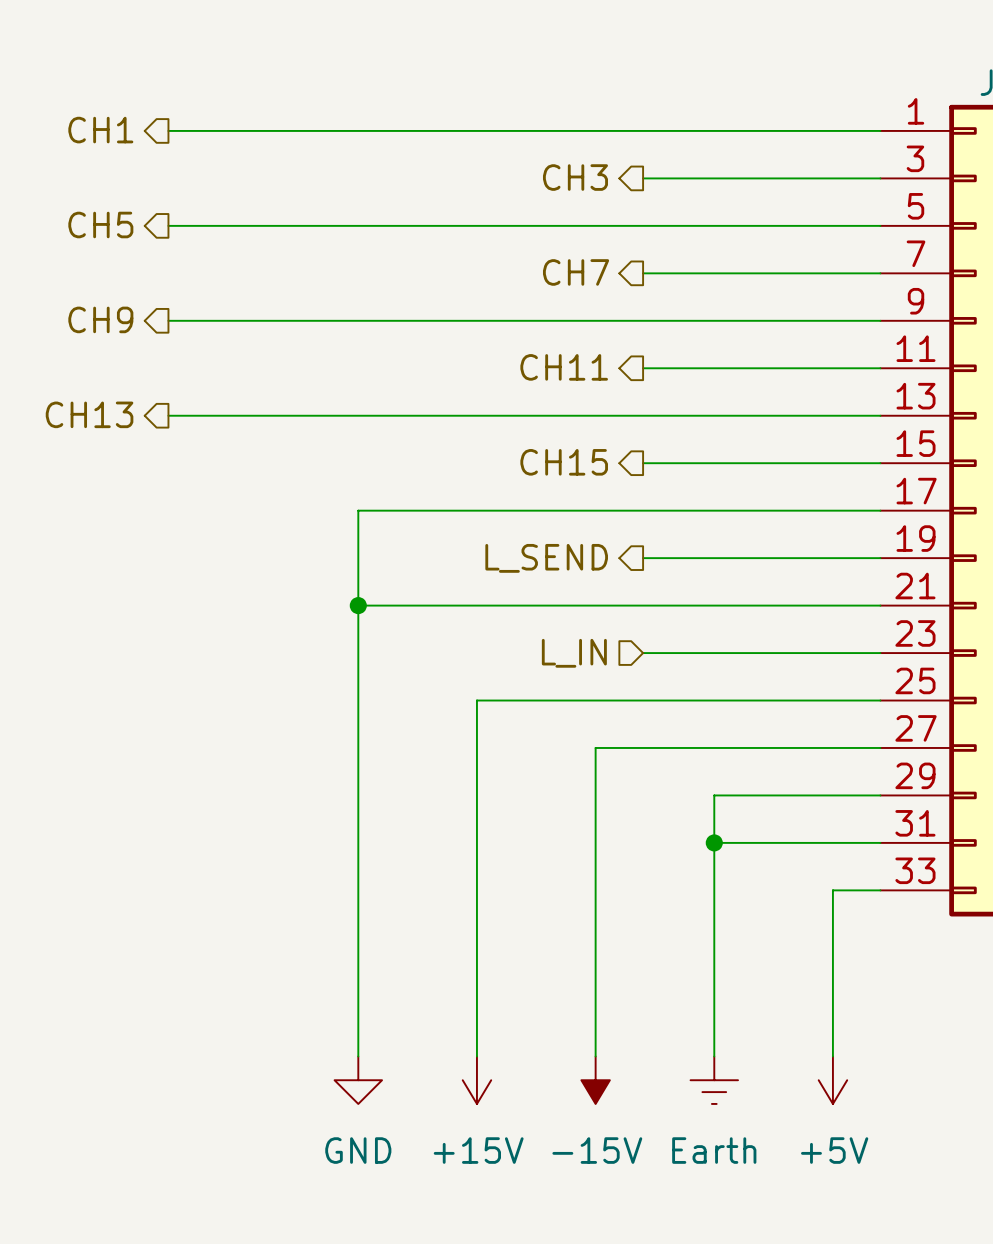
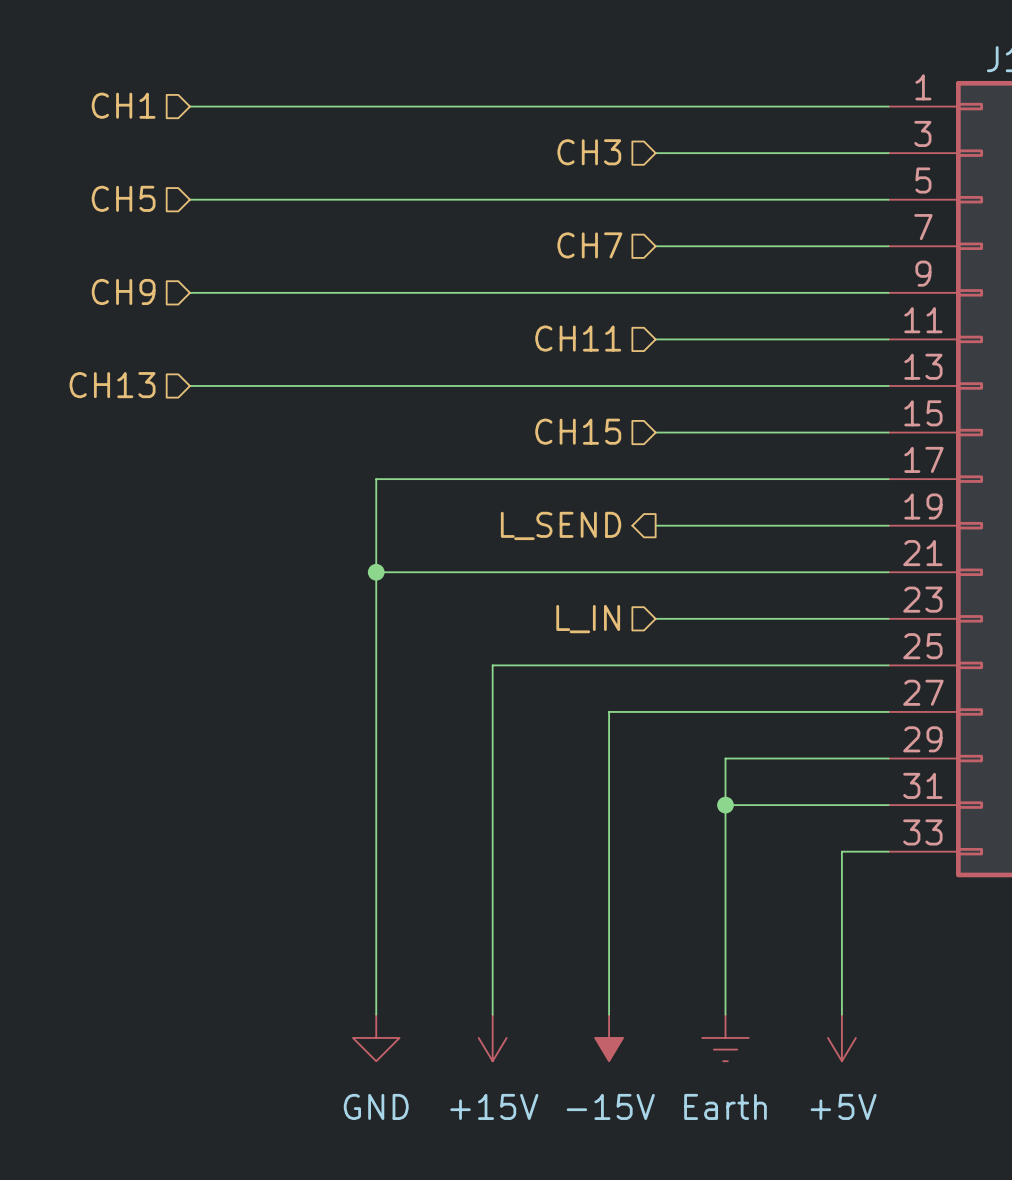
hierarchical label shape: output (100, 130) -> input (123, 105)
hierarchical label shape: output (575, 177) -> input (589, 152)
hierarchical label shape: output (100, 225) -> input (123, 198)
hierarchical label shape: output (576, 272) -> input (589, 245)
hierarchical label shape: output (100, 319) -> input (123, 291)
hierarchical label shape: output (564, 367) -> input (578, 338)
hierarchical label shape: output (89, 414) -> input (112, 385)
hierarchical label shape: output (564, 462) -> input (578, 431)

